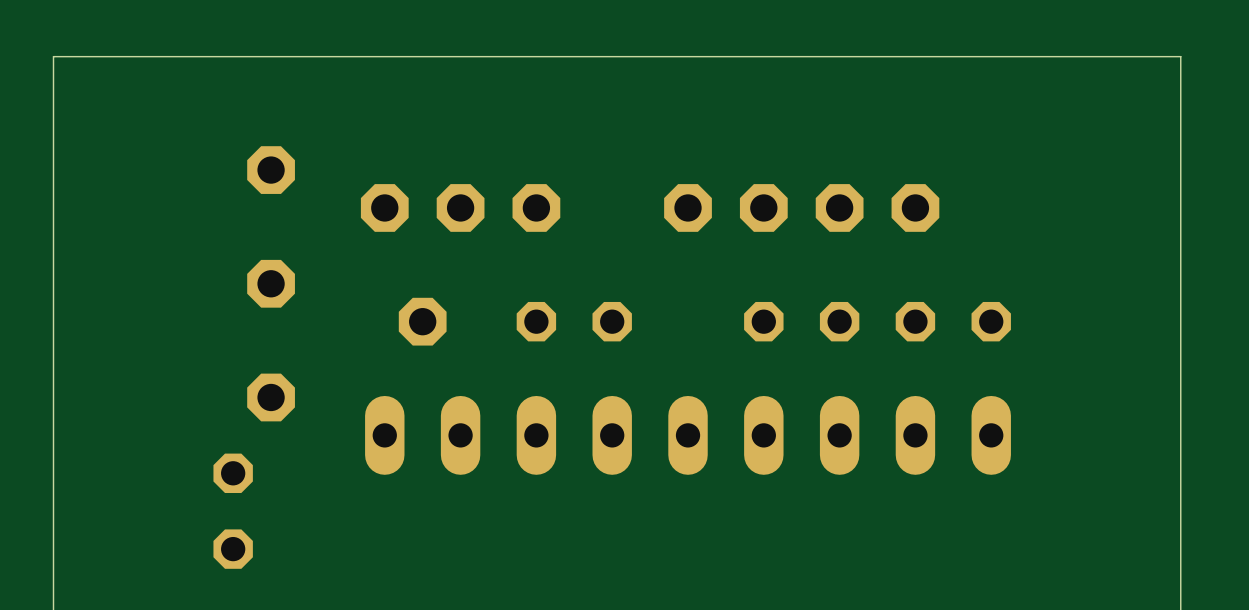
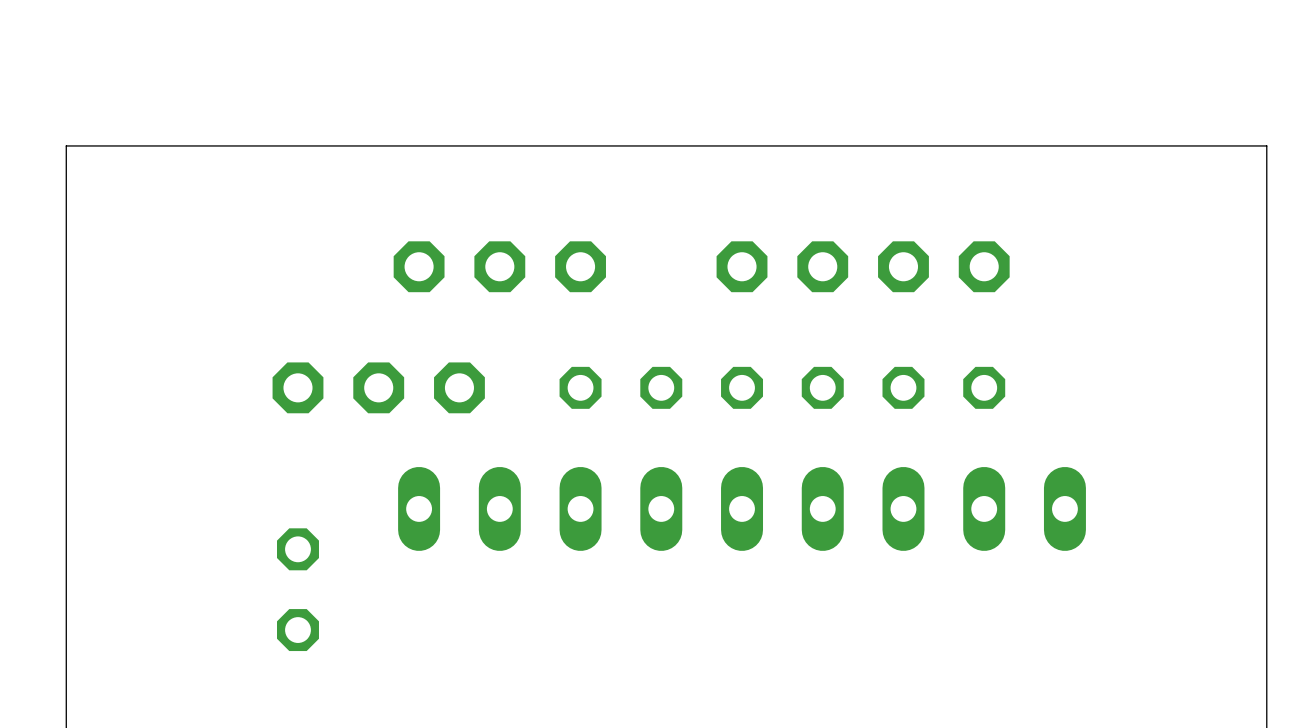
board edge: (1180, 94) (1180, 56) (53, 56) (53, 94) -> (1266, 145) (66, 145)
part: (271, 170) -> none
part: (271, 283) -> none
part: none -> (297, 387)
part: none -> (378, 387)
part: none -> (782, 387)
part: (953, 321) -> none
part: (271, 397) -> none
part position: (233, 511) -> (297, 589)

